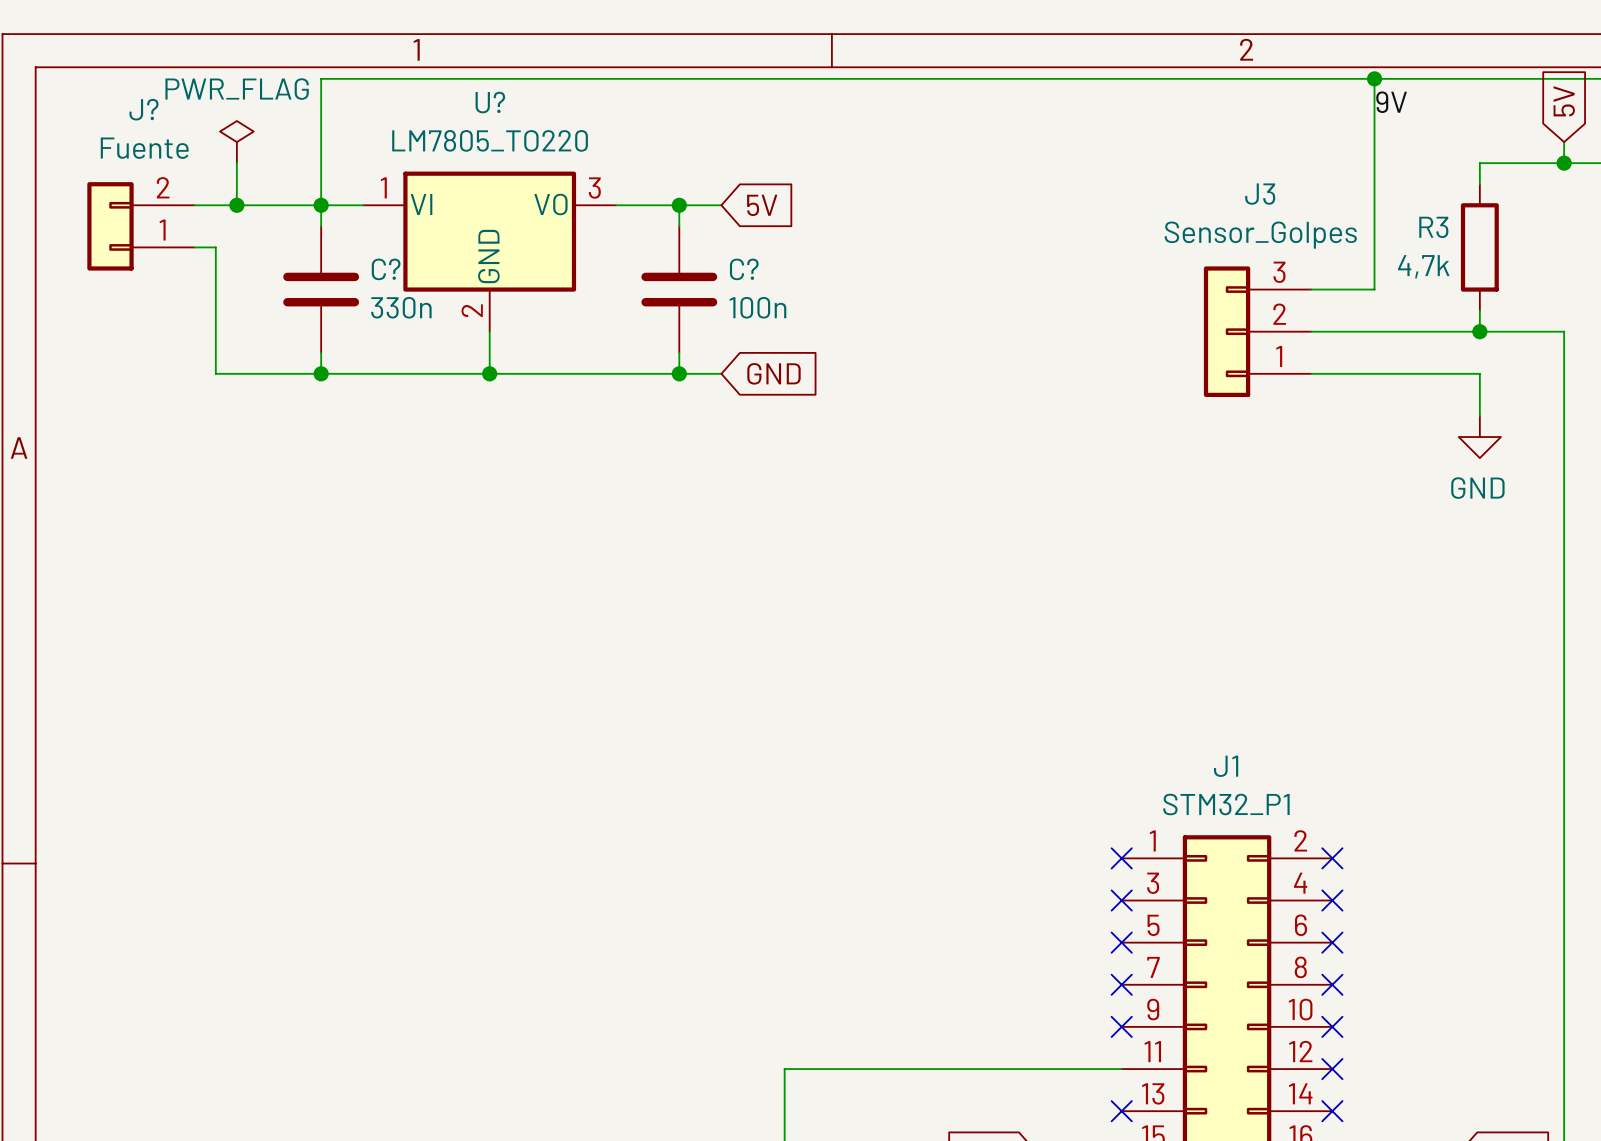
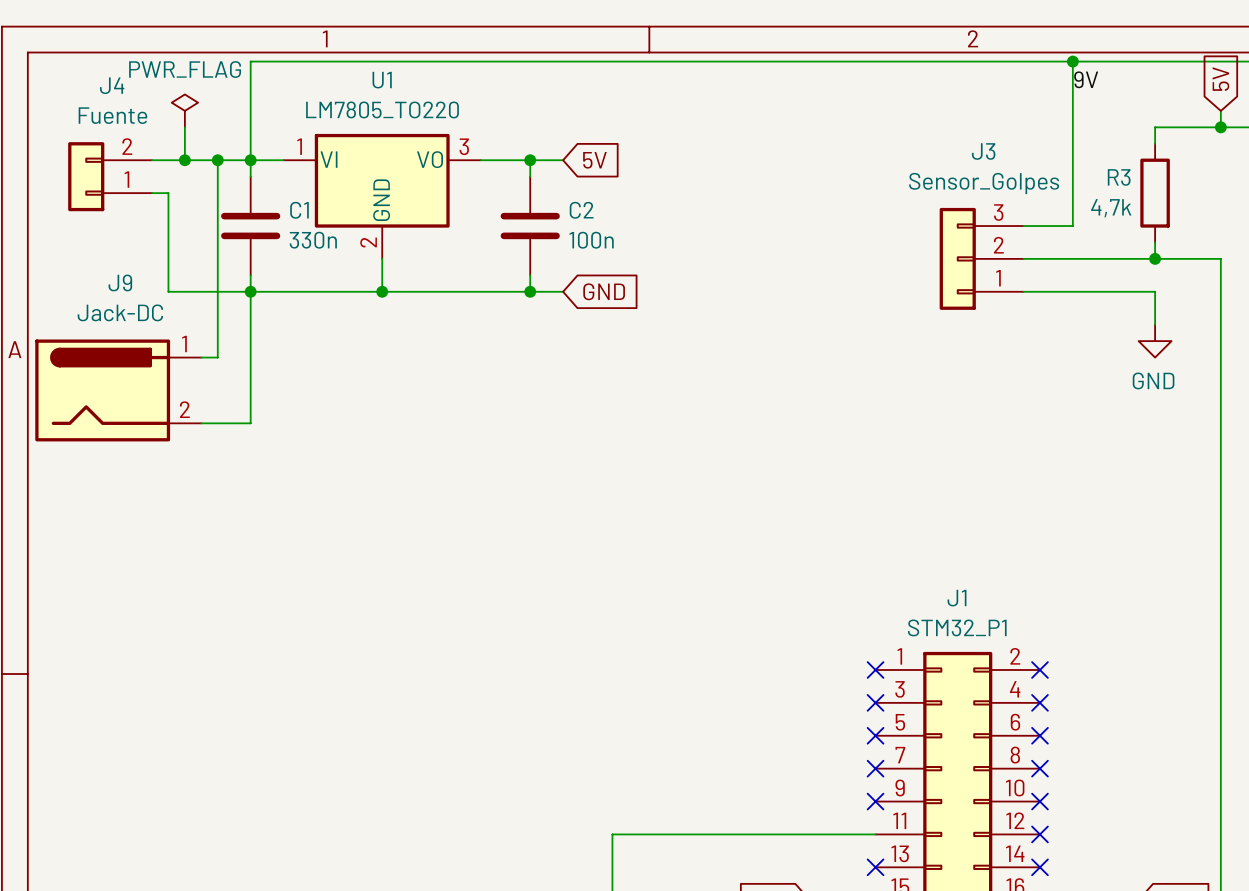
U? name: U? (490, 102) -> U1 (382, 80)
J? name: J? (143, 109) -> J4 (112, 85)
wire: none -> (217, 160) (217, 357) (201, 357)
junction: none -> (217, 160)
C? name: C? (386, 269) -> C1 (299, 210)
C? name: C? (744, 269) -> C2 (581, 210)
wire: none -> (250, 291) (250, 423) (201, 423)
J9: none -> Jack-DC (118, 390)

